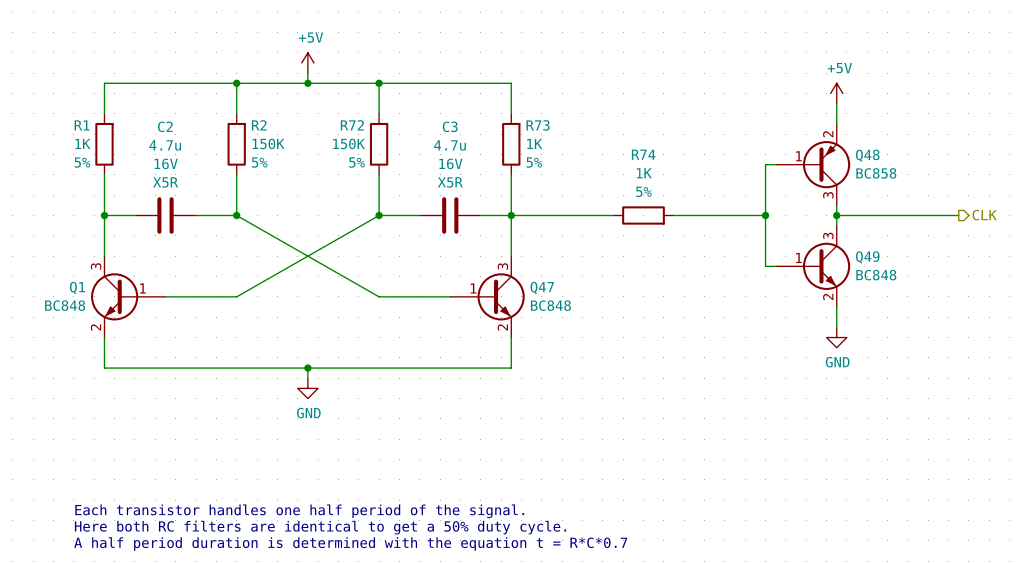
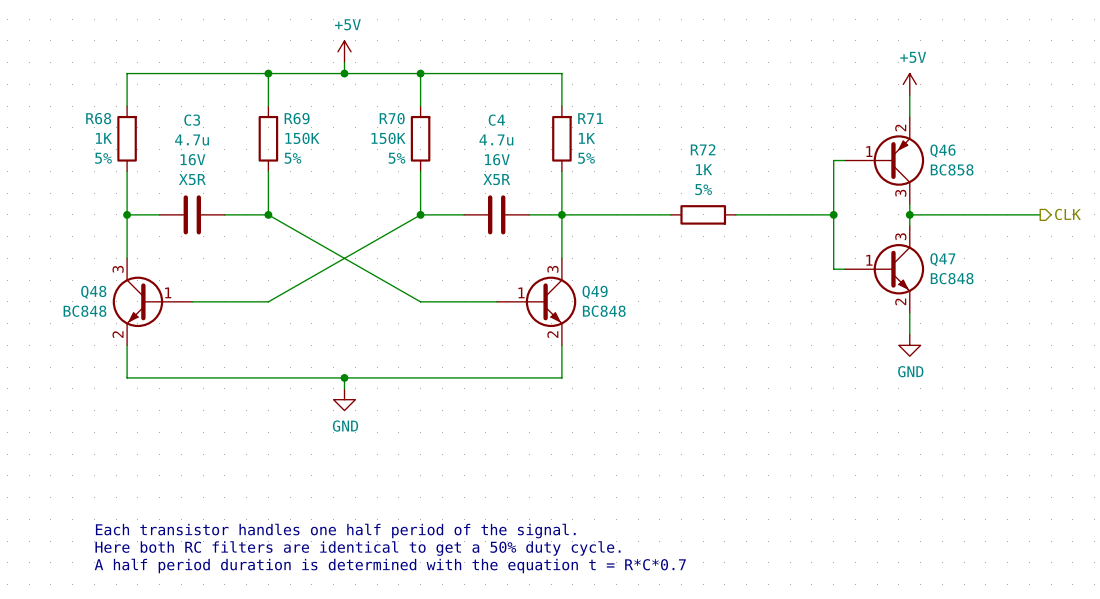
R1 name: R1 (82, 125) -> R68 (98, 118)
R2 name: R2 (259, 125) -> R69 (297, 118)
R72 name: R72 (352, 125) -> R70 (392, 118)
R73 name: R73 (538, 125) -> R71 (590, 118)
C2 name: C2 (165, 126) -> C3 (192, 120)
C3 name: C3 (450, 126) -> C4 (496, 120)
R74 name: R74 (643, 154) -> R72 (703, 149)
Q48 name: Q48 (867, 155) -> Q46 (942, 151)
Q49 name: Q49 (867, 257) -> Q47 (942, 259)
Q1 name: Q1 (77, 287) -> Q48 (93, 292)
Q47 name: Q47 (542, 287) -> Q49 (595, 292)

